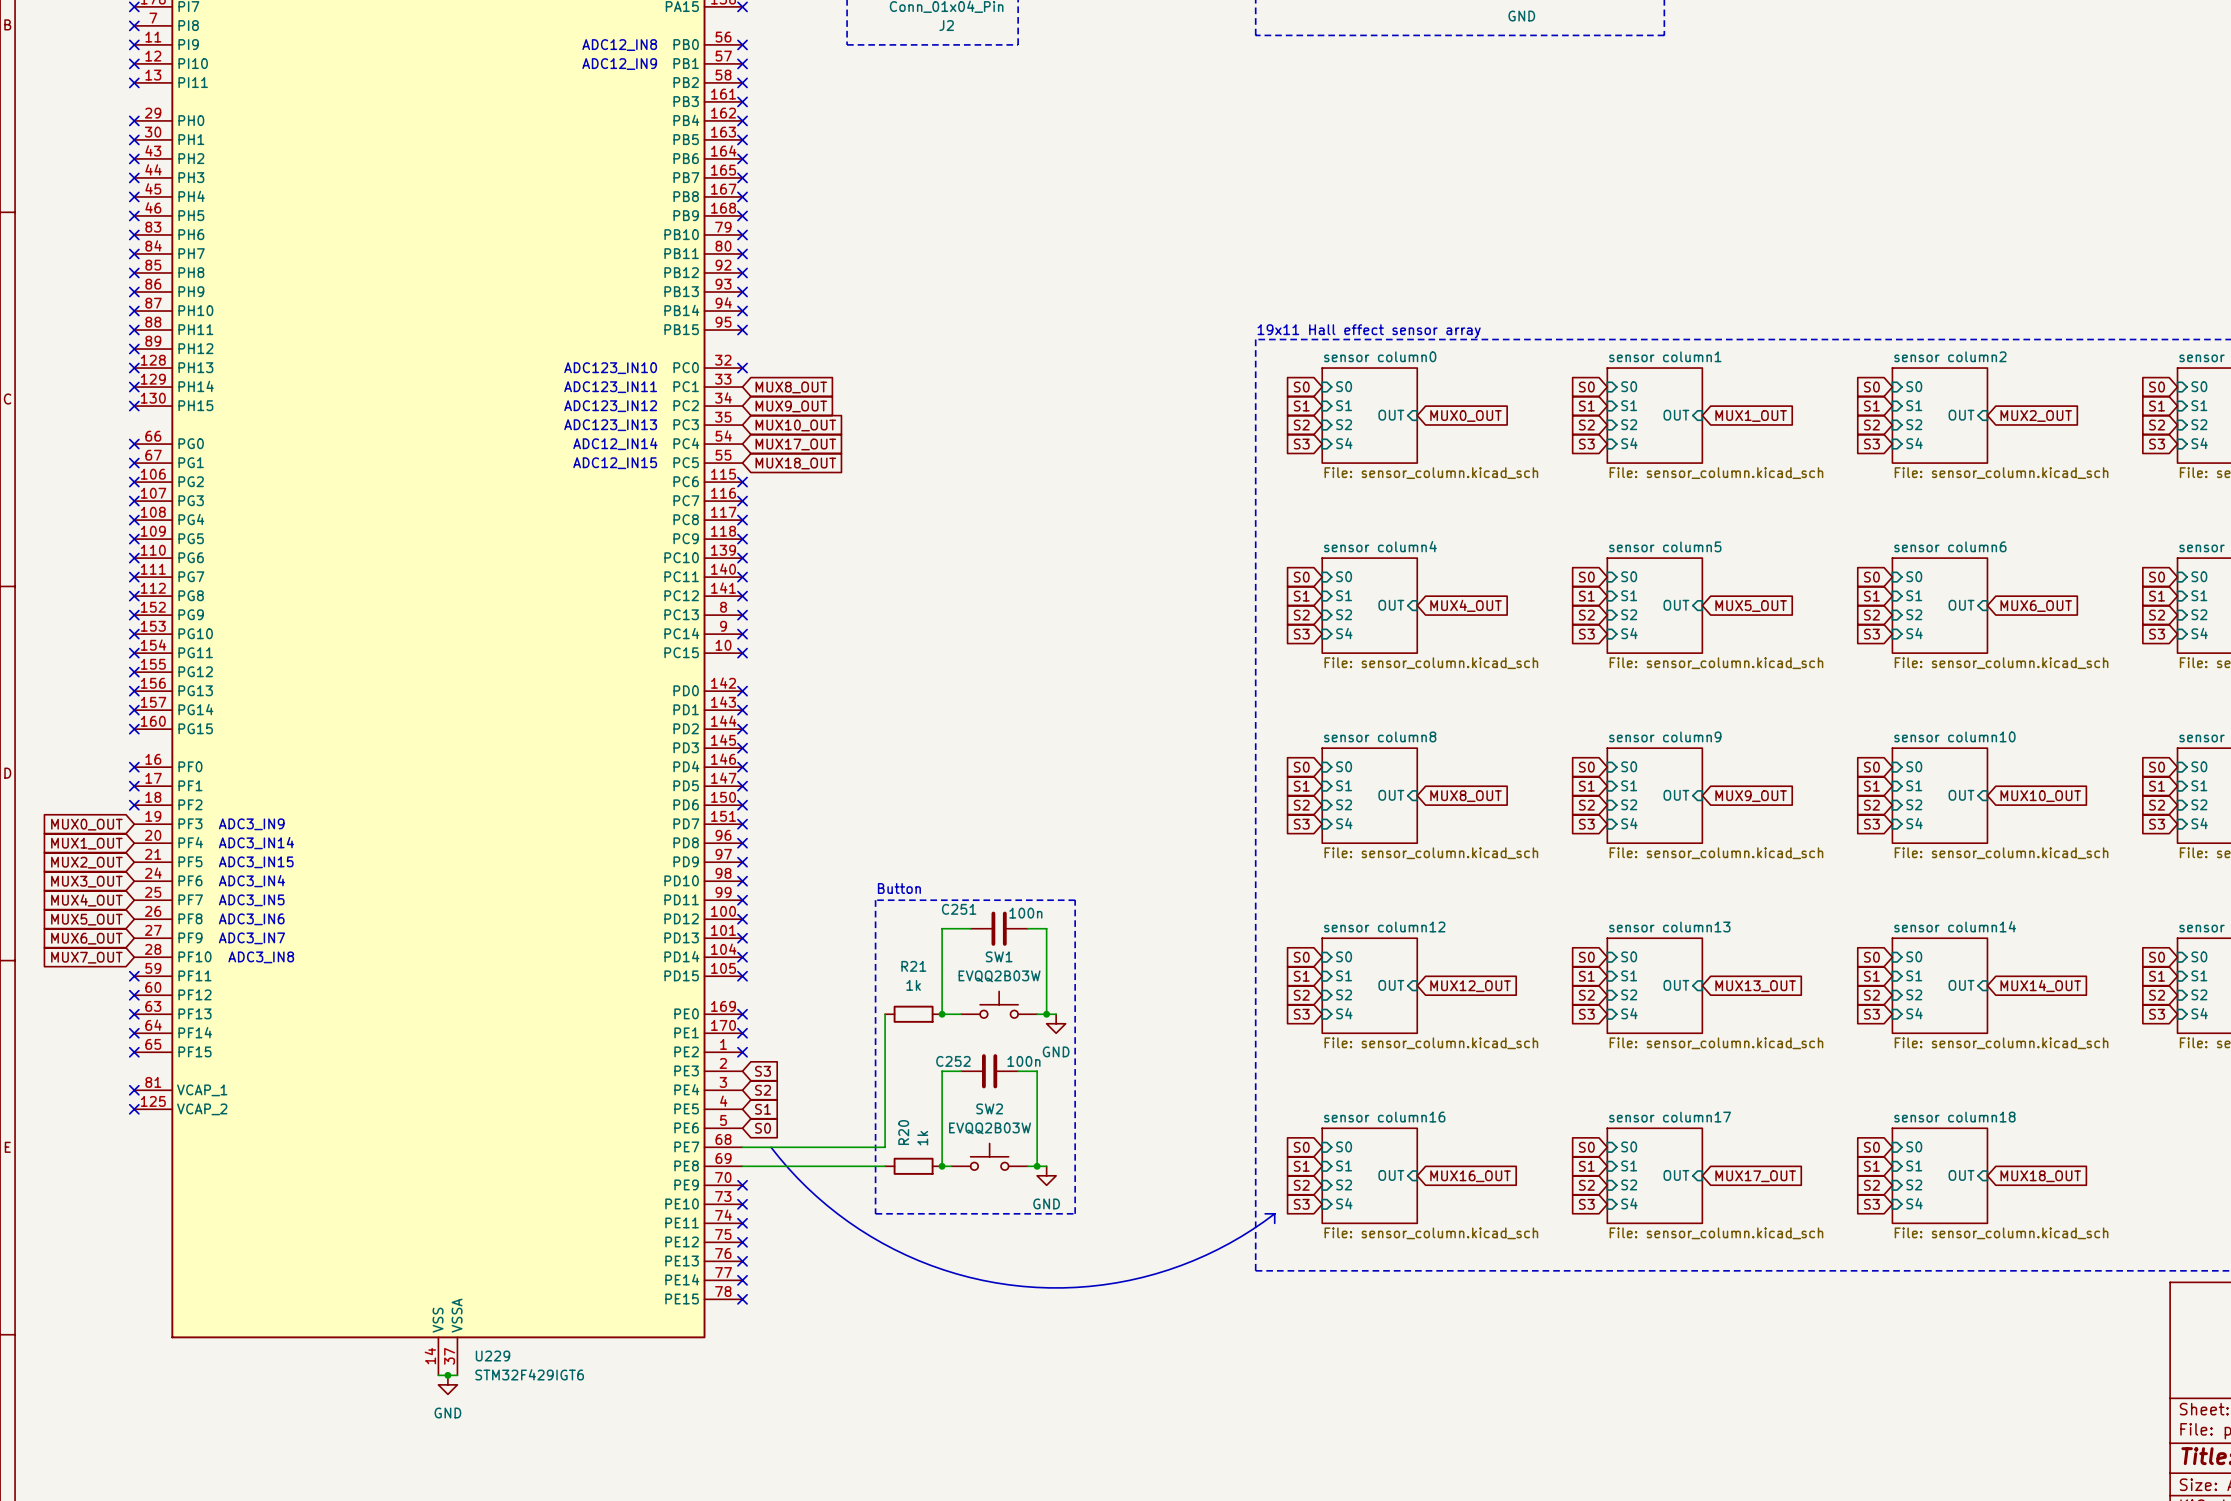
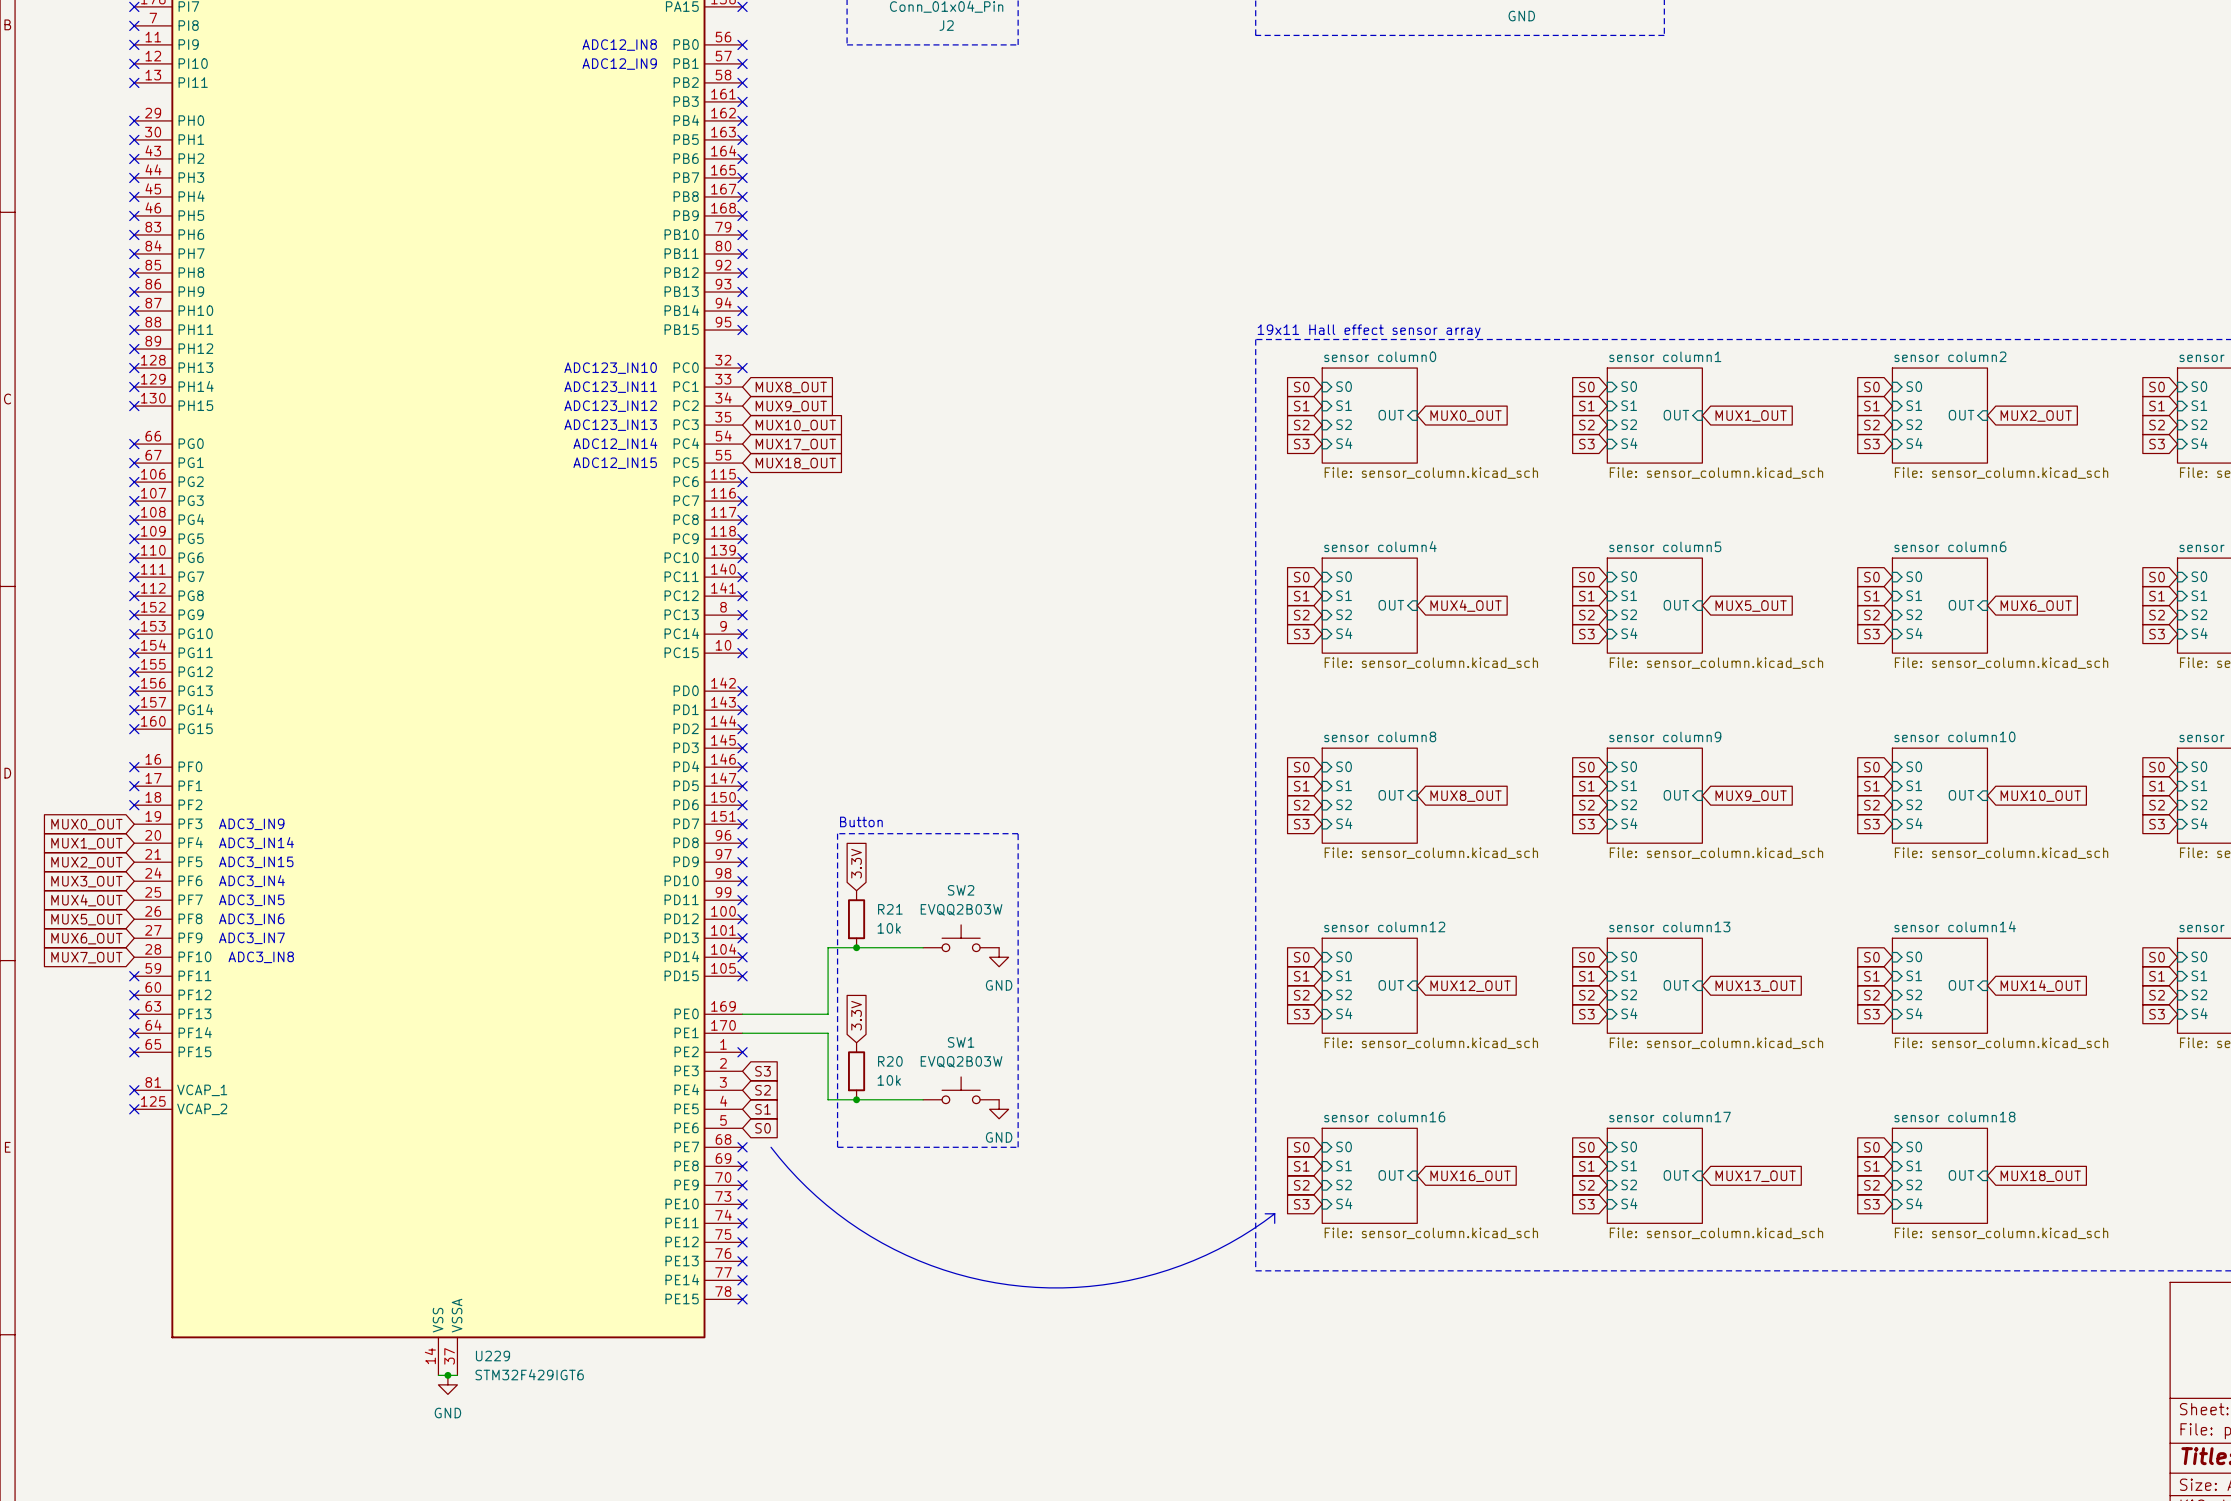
line: none -> (837, 833) (1018, 833) (1018, 1147) (837, 1147) (837, 833)
global label: none -> 3.3V (856, 863)
text position: Button (899, 888) -> Button (861, 821)
line: (875, 900) (1075, 900) (1075, 1213) (875, 1213) (875, 900) -> none
wire: (970, 928) (942, 928) (942, 1014) (961, 1014) -> none
C251: 100n (999, 928) -> none
wire: (1027, 928) (1046, 928) (1046, 1014) -> none
junction: none -> (856, 947)
wire: none -> (923, 947) (828, 947) (828, 1014) (742, 1014)
power symbol: none -> GND (999, 957)
R21 name position: R21 (913, 966) -> R21 (890, 909)
R21 value: 1k (913, 985) -> 10k (889, 928)
SW1 position: (999, 1004) -> (961, 1090)
no-connect mark: (742, 1014) -> none
wire: (885, 1014) (885, 1147) (742, 1147) -> none
R21 rotation: 0° (913, 1014) -> 90° clockwise (856, 919)
R21 position: (913, 1014) -> (856, 919)
junction: (942, 1014) -> none
wire: (1037, 1014) (1056, 1014) -> none
junction: (1046, 1014) -> none
global label: none -> 3.3V (856, 1015)
power symbol: GND (1056, 1023) -> none
wire: none -> (742, 1033) (828, 1033) (828, 1099) (923, 1099)
no-connect mark: (742, 1033) -> none
wire: (961, 1071) (942, 1071) (942, 1166) (951, 1166) -> none
C252: 100n (989, 1071) -> none
wire: (1018, 1071) (1037, 1071) (1037, 1166) -> none
junction: none -> (856, 1099)
power symbol: none -> GND (999, 1109)
R20 value: 1k (922, 1138) -> 10k (889, 1080)
no-connect mark: none -> (742, 1147)
SW2 position: (989, 1156) -> (961, 938)
wire: (742, 1166) (885, 1166) -> none
no-connect mark: none -> (742, 1166)
R20 rotation: 0° (913, 1166) -> 90° clockwise (856, 1071)
R20 position: (913, 1166) -> (856, 1071)
junction: (942, 1166) -> none
wire: (1027, 1166) (1046, 1166) -> none
junction: (1037, 1166) -> none
power symbol: GND (1046, 1175) -> none

